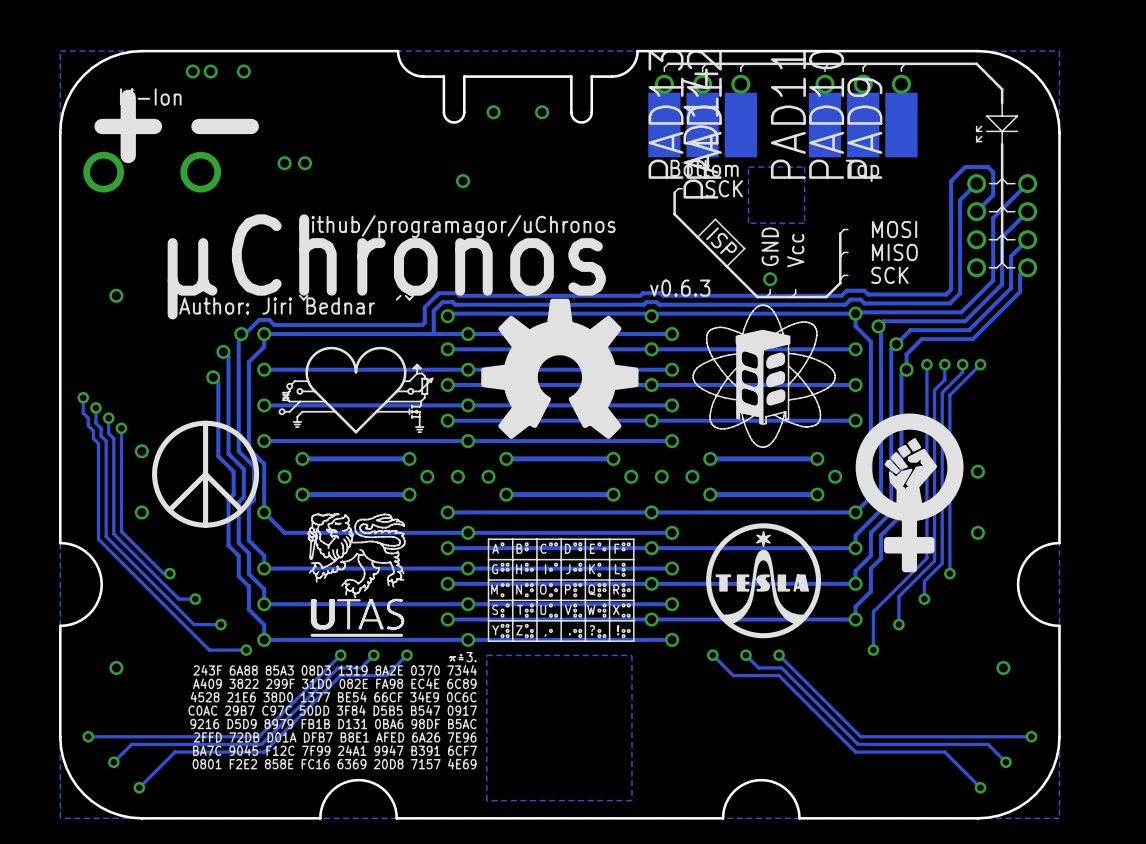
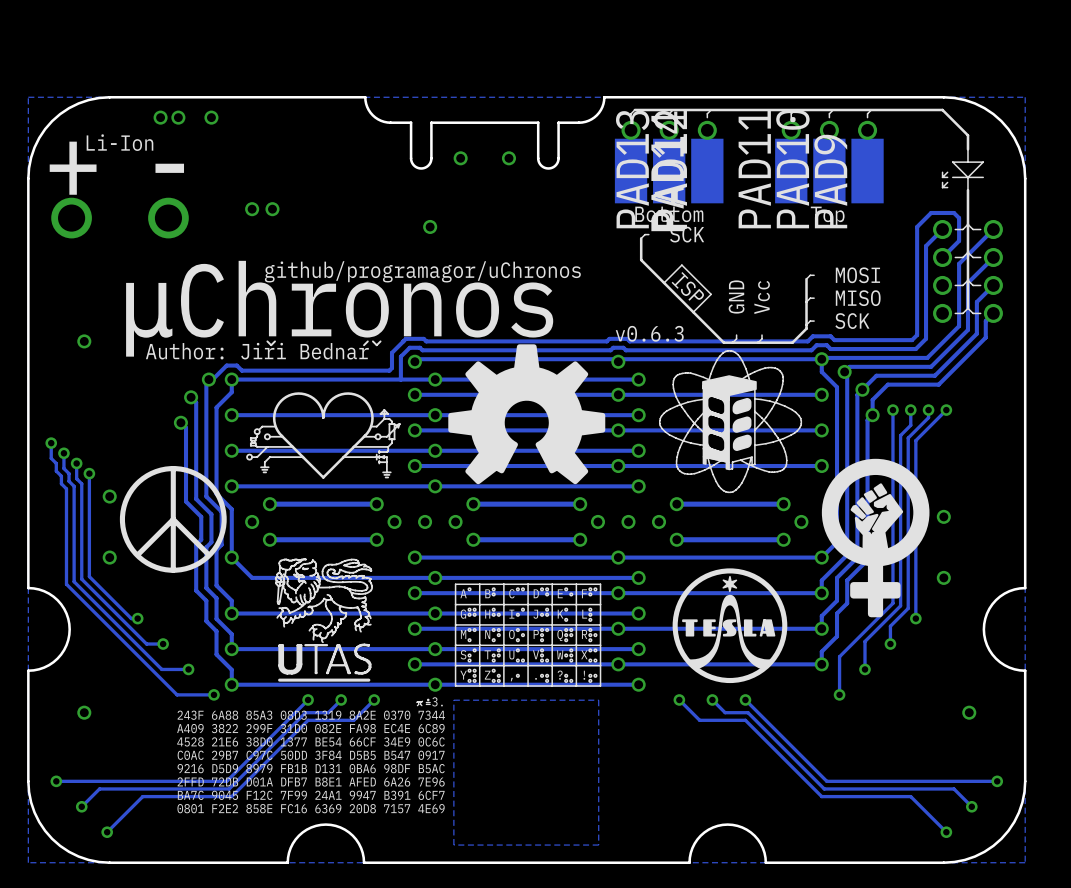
zone outline: (804, 167) (748, 167) (748, 223) (804, 223) (804, 167) -> none
via: (770, 279) -> none

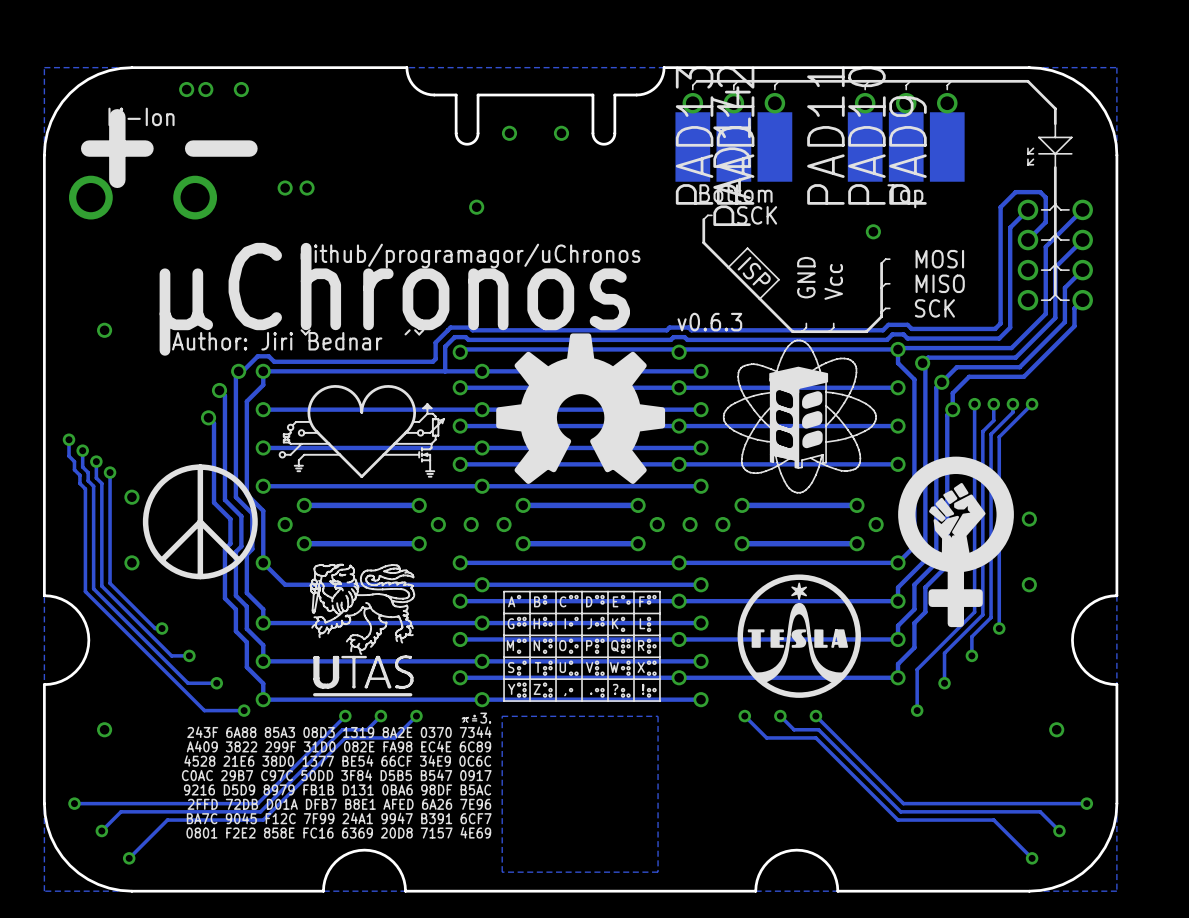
via: none -> (873, 231)

